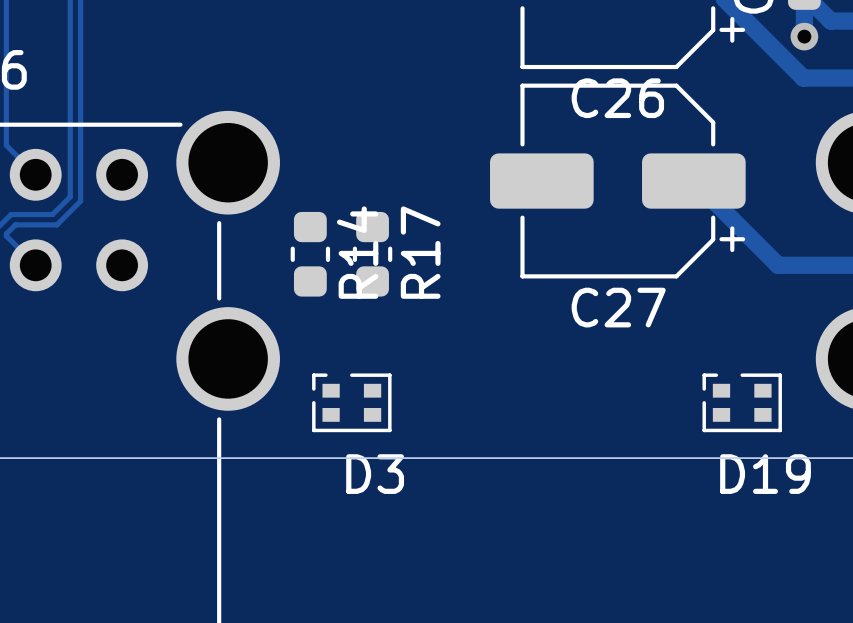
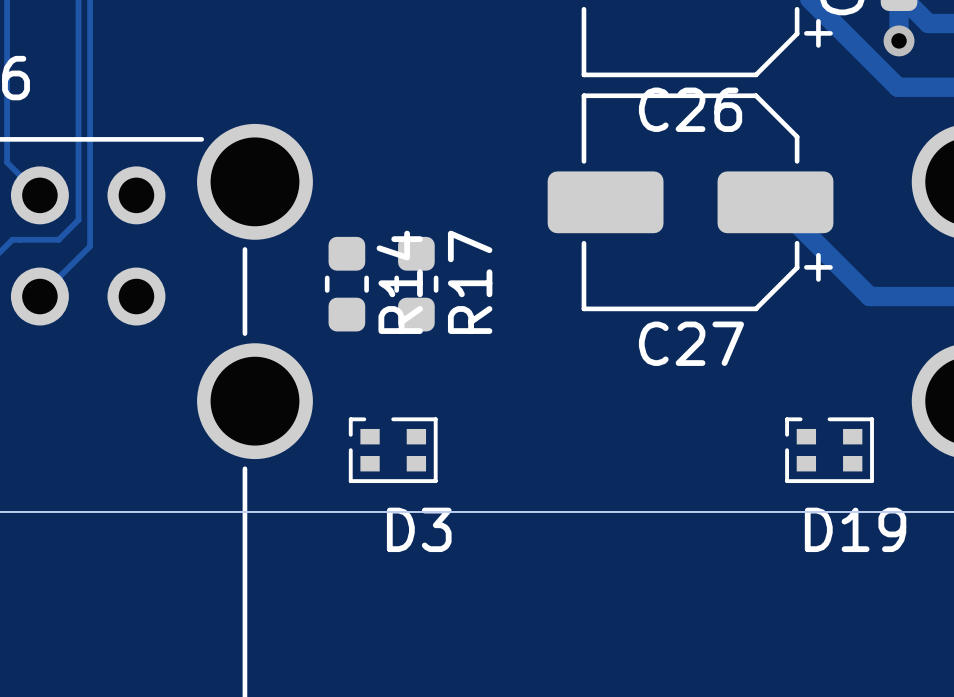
track: (80, 201) (56, 224) (15, 224) (6, 233) (35, 265) -> (90, 224) (90, 246) (39, 296)

